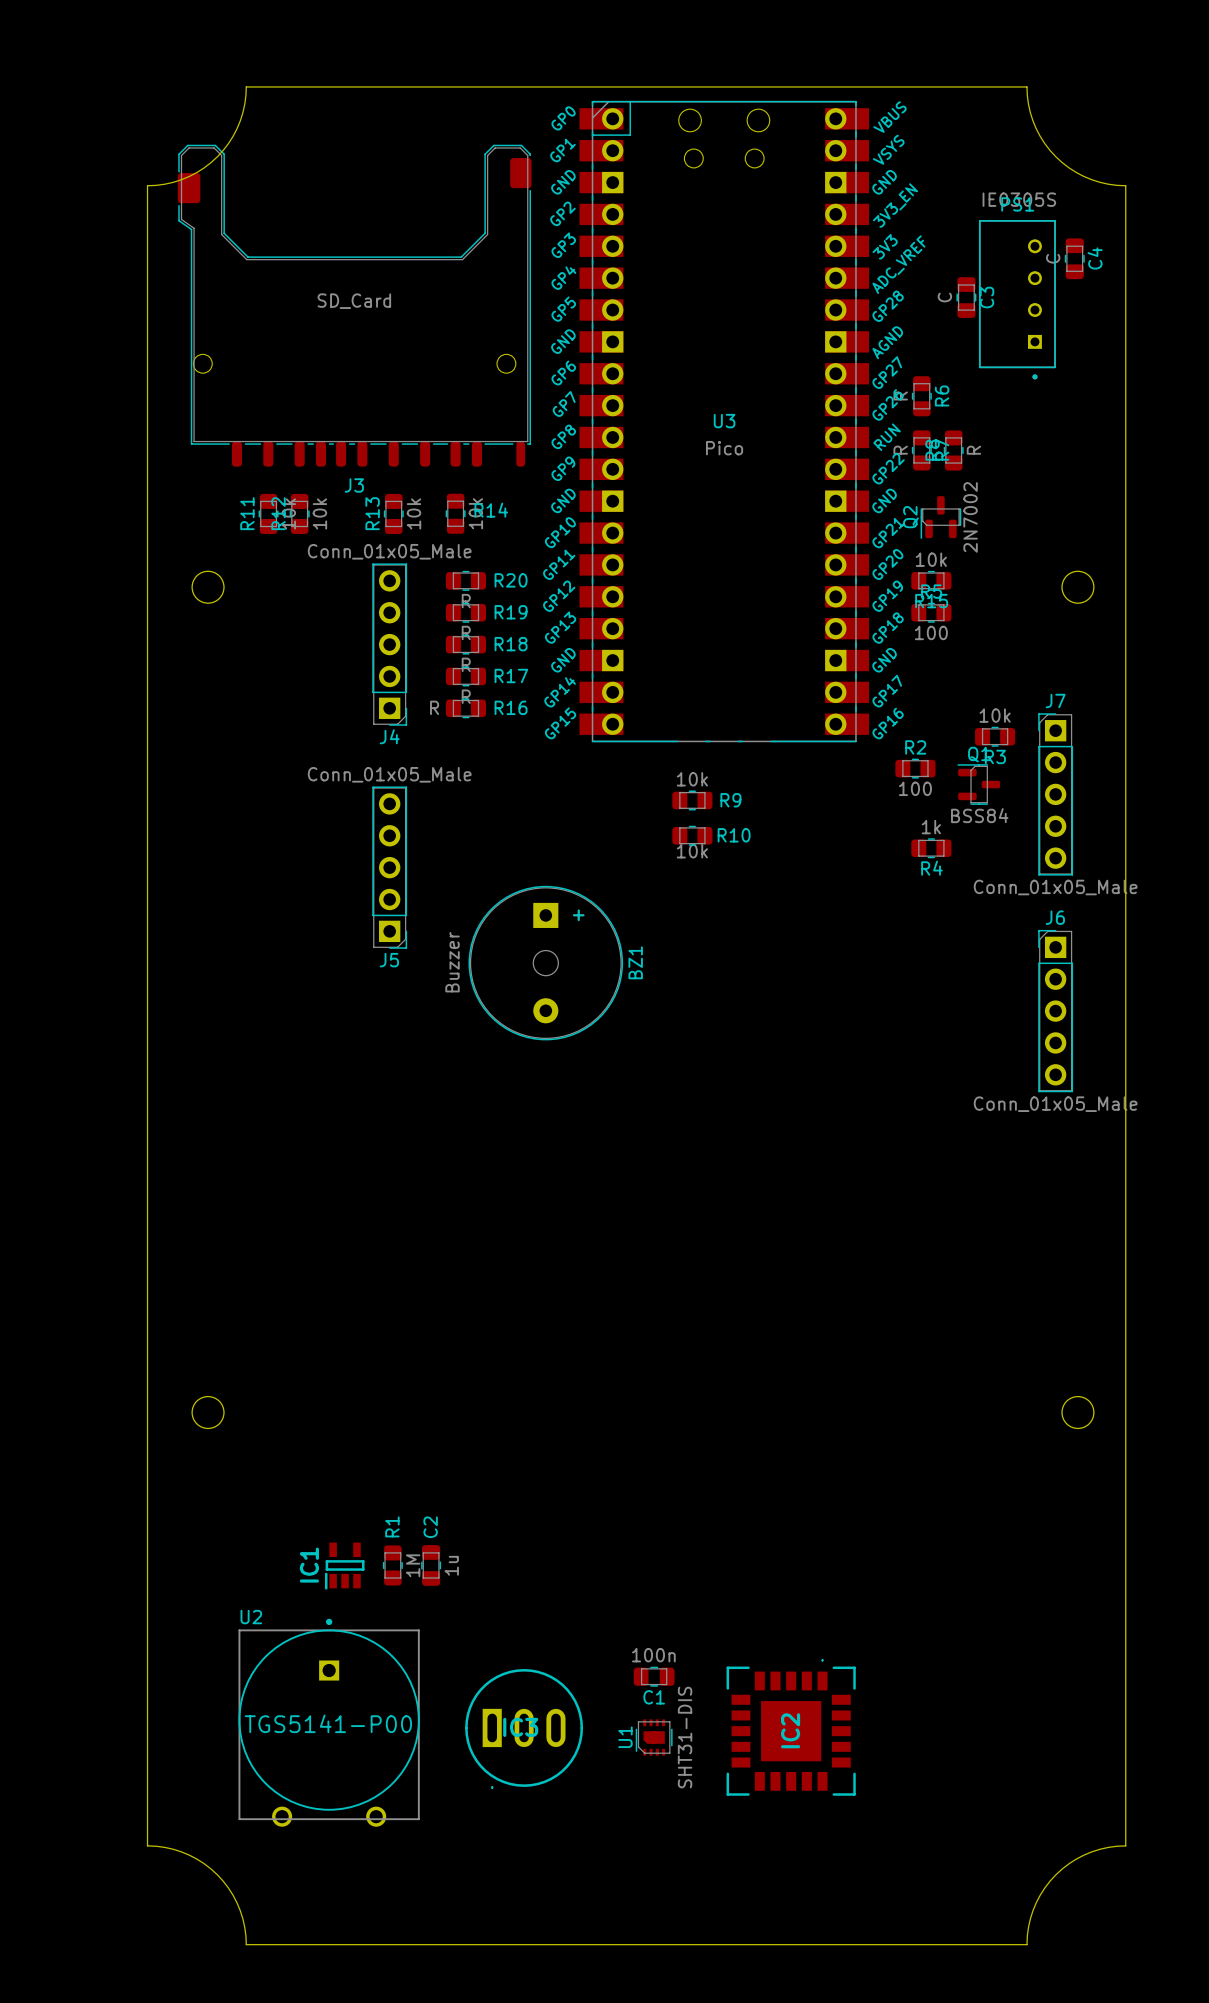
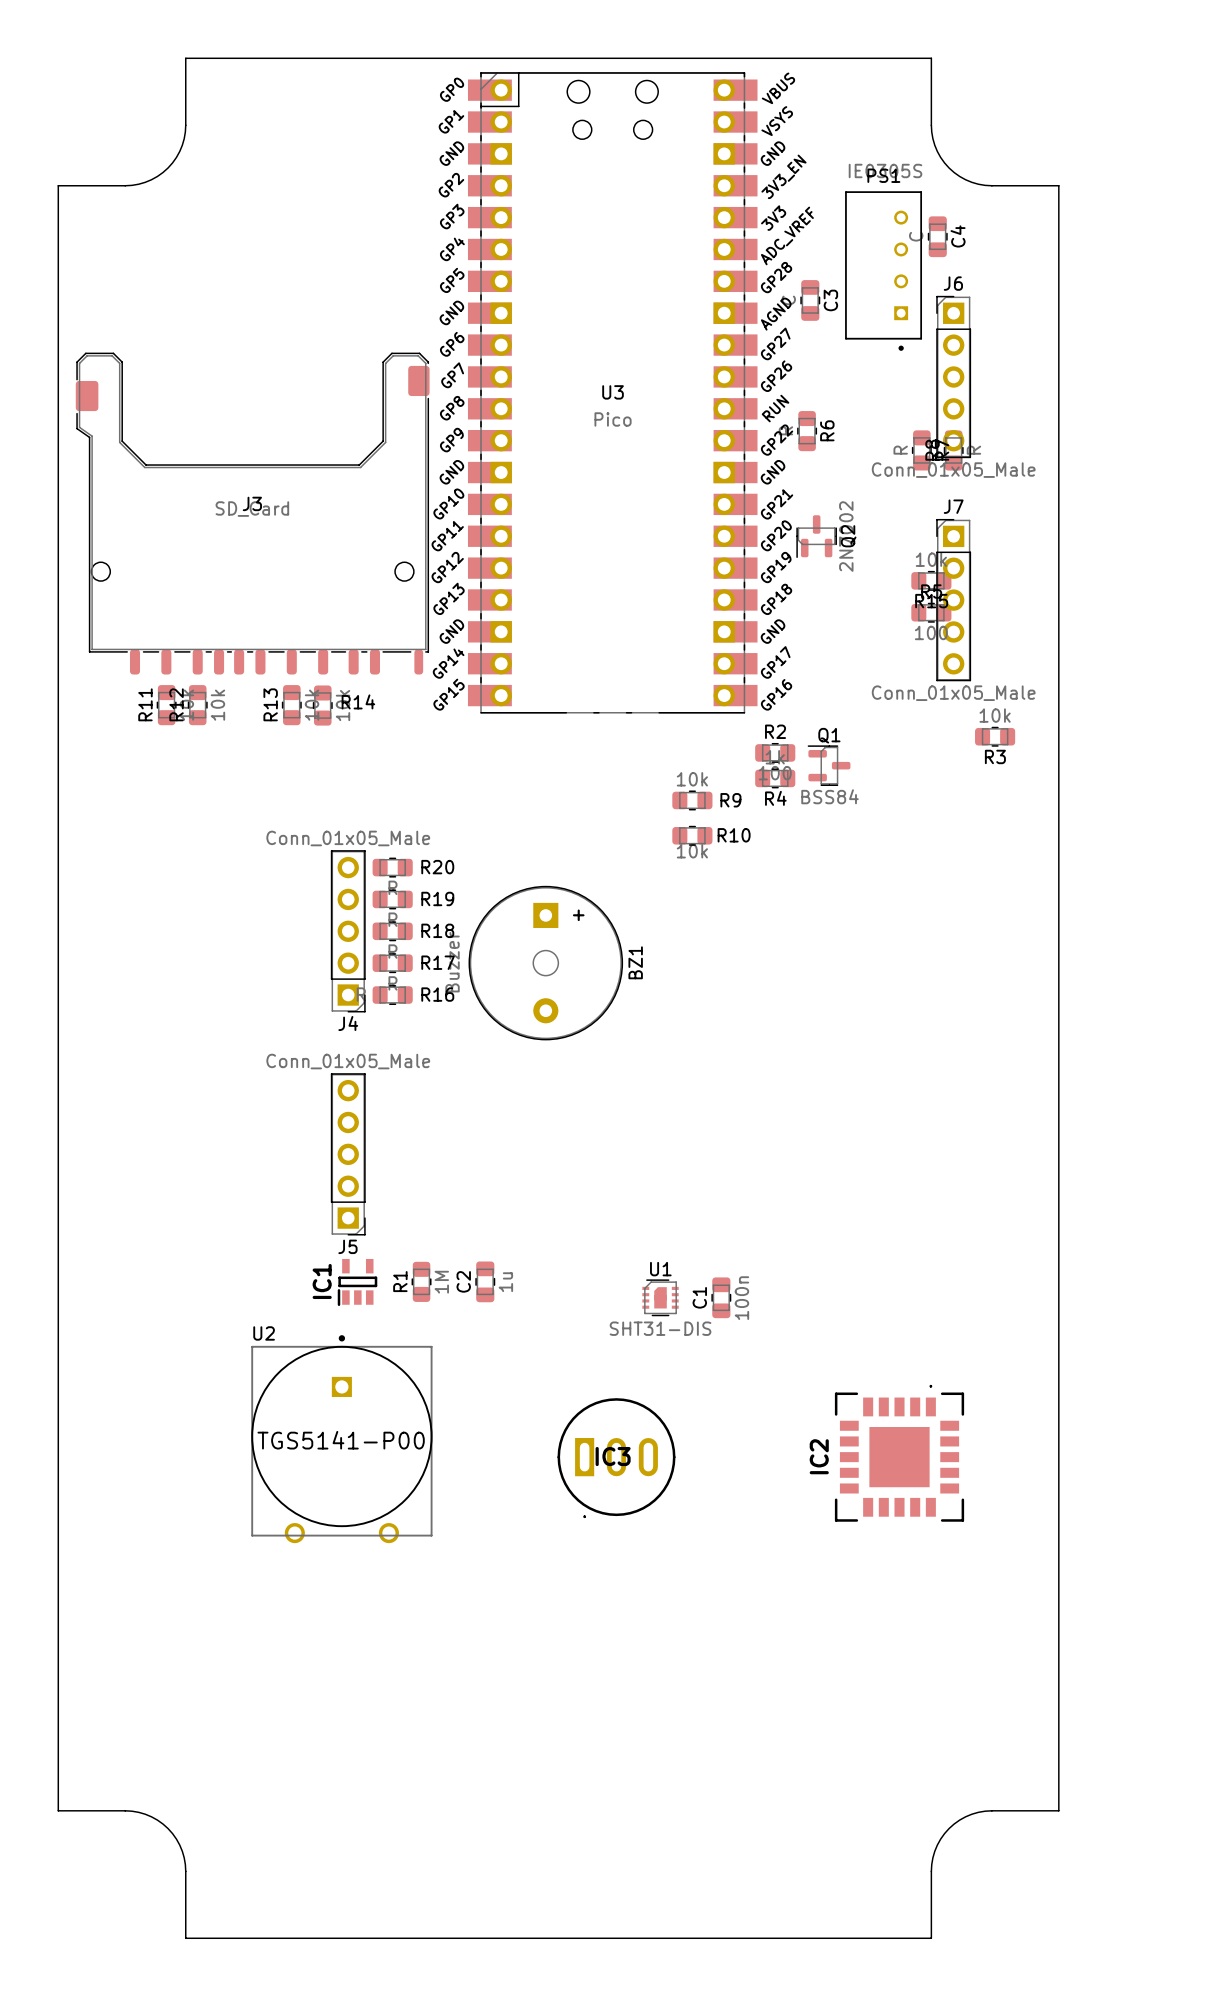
board edge: (246, 86) (1026, 86) (1028, 104) (1032, 120) (1040, 136) (1055, 156) (1069, 167) (1091, 179) (1108, 184) (1125, 185) (1125, 1845) (1100, 1849) (1083, 1855) (1069, 1863) (1055, 1874) (1044, 1887) (1032, 1910) (1028, 1927) (1026, 1944) (246, 1944) (244, 1927) (240, 1910) (228, 1887) (217, 1874) (204, 1863) (189, 1855) (164, 1847) (147, 1845) (147, 185) (173, 182) (189, 176) (204, 167) (217, 156) (228, 143) (237, 128) (244, 104) (246, 86) -> (185, 58) (185, 131) (179, 151) (168, 168) (151, 179) (131, 185) (58, 185) (58, 1810) (131, 1811) (151, 1816) (168, 1828) (179, 1845) (185, 1864) (185, 1938) (931, 1938) (931, 1864) (937, 1845) (949, 1828) (965, 1816) (985, 1811) (1058, 1810) (1058, 185) (985, 185) (965, 179) (949, 168) (937, 151) (931, 131) (931, 58) (185, 58)
C4 position: (1074, 258) -> (937, 236)
C3 position: (966, 297) -> (810, 300)
PS1 position: (1017, 299) -> (883, 271)
J3 position: (354, 305) -> (252, 513)
R6 position: (921, 396) -> (807, 431)
U3 position: (724, 421) -> (612, 392)
J3 name position: J3 (354, 485) -> J3 (252, 503)
R11 position: (268, 513) -> (166, 705)
R12 position: (299, 513) -> (197, 705)
R13 position: (393, 513) -> (291, 705)
R14 position: (455, 513) -> (322, 705)
Q2 name position: Q2 (910, 517) -> Q2 (848, 536)
Q2 position: (940, 517) -> (816, 536)
round board edge: [191, 570, 225, 604] -> none
round board edge: [1061, 570, 1095, 604] -> none
R20 position: (465, 580) -> (392, 867)
R19 position: (465, 612) -> (392, 899)
J4 position: (389, 644) -> (348, 931)
R18 position: (465, 644) -> (392, 931)
R17 position: (465, 676) -> (392, 963)
R16 position: (465, 708) -> (392, 995)
R2 position: (915, 768) -> (775, 752)
Q1 position: (978, 784) -> (829, 765)
J7 position: (1055, 794) -> (953, 600)
R4 position: (931, 848) -> (775, 778)
J5 position: (389, 867) -> (348, 1154)
J6 position: (1055, 1011) -> (953, 377)
round board edge: [191, 1395, 225, 1430] -> none
round board edge: [1061, 1395, 1095, 1430] -> none
R1 name position: R1 (392, 1526) -> R1 (400, 1281)
C2 name position: C2 (430, 1527) -> C2 (463, 1281)
R1 position: (392, 1565) -> (421, 1281)
C2 position: (431, 1565) -> (485, 1281)
IC1 position: (344, 1566) -> (357, 1282)
C1 rotation: 0° (654, 1676) -> 90° clockwise (721, 1297)
C1 position: (654, 1676) -> (721, 1297)
U2 position: (329, 1722) -> (341, 1439)
IC2 position: (791, 1727) -> (899, 1453)
IC3 position: (524, 1728) -> (616, 1458)
IC2 name position: IC2 (790, 1730) -> IC2 (819, 1456)
U1 rotation: 0° (654, 1737) -> 90° clockwise (660, 1297)
U1 position: (654, 1737) -> (660, 1297)

